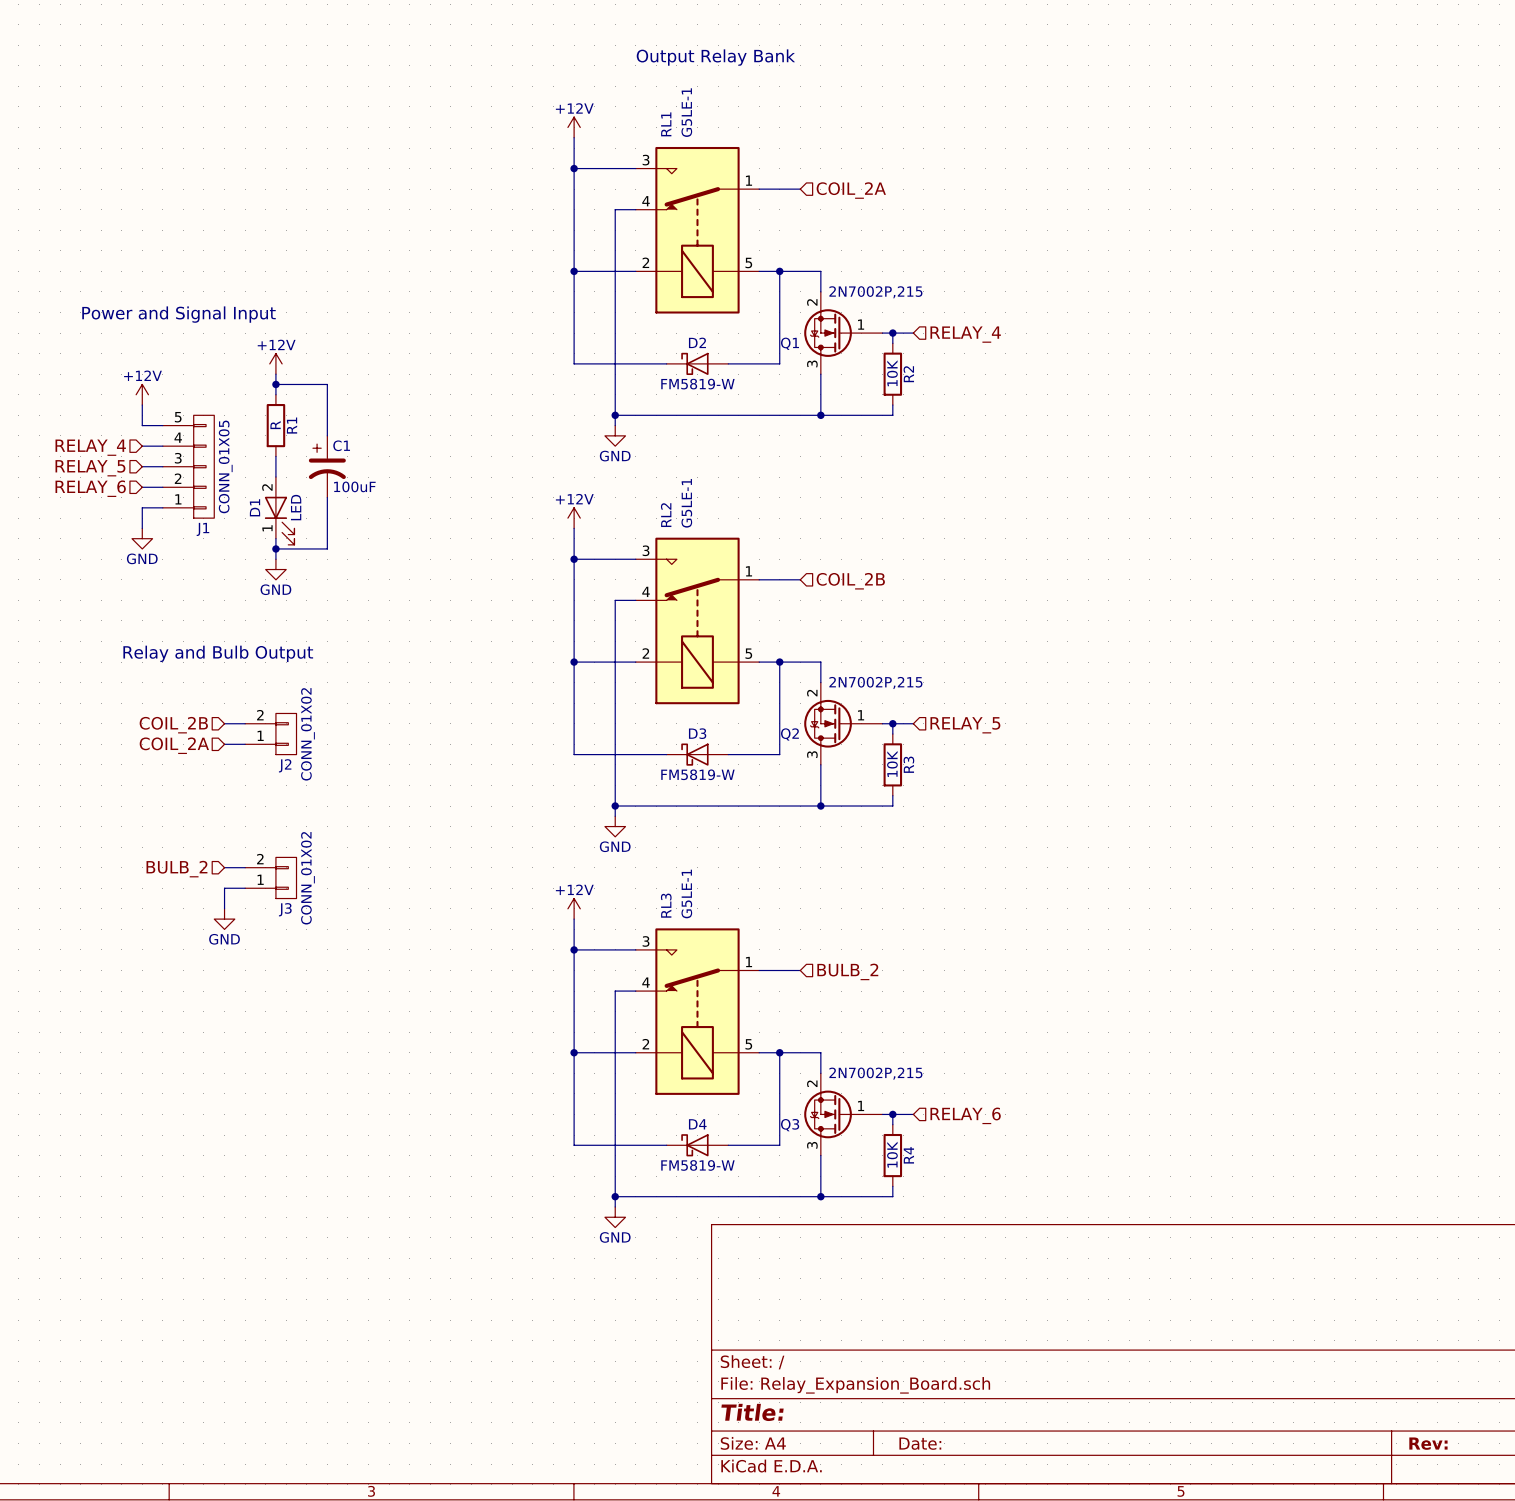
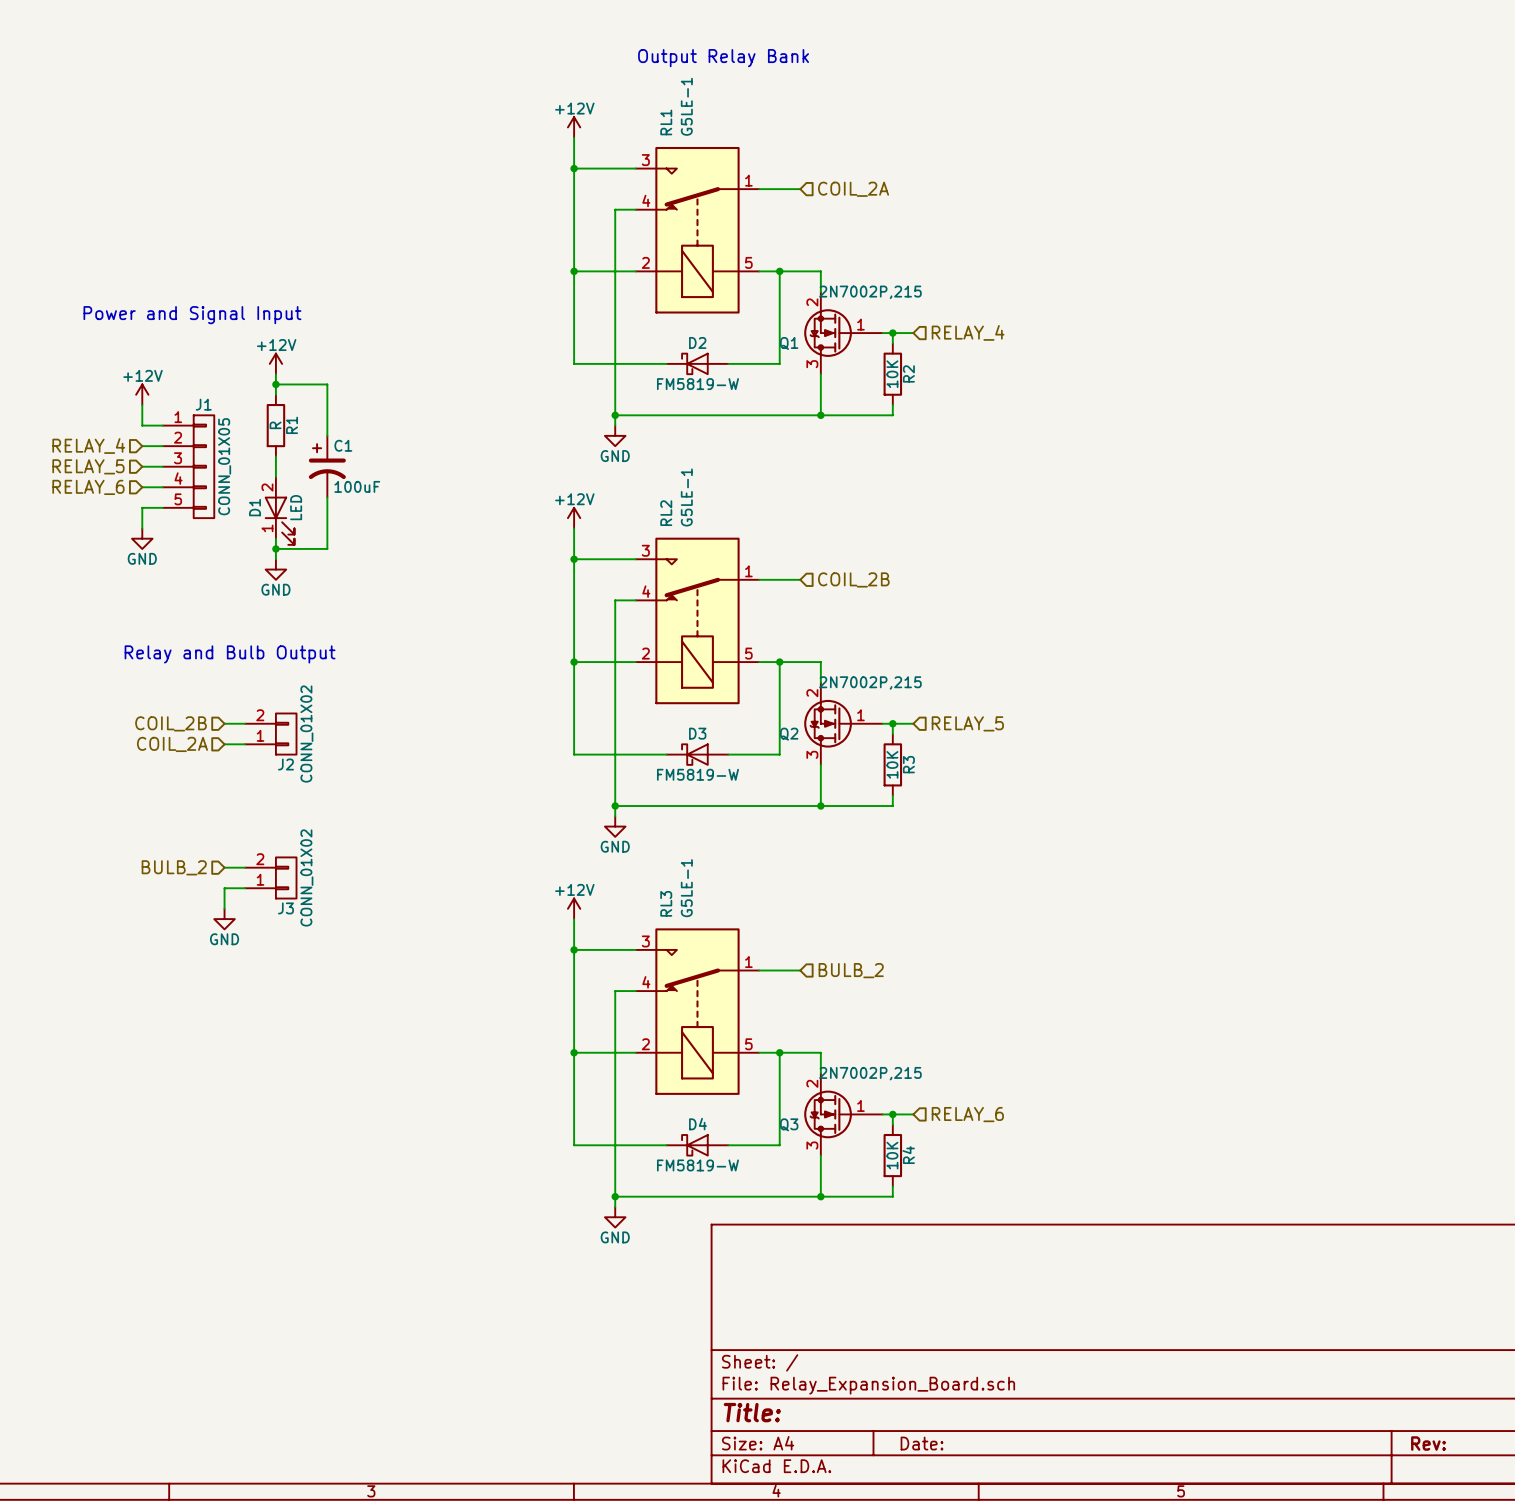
J1 flip: as is (203, 466) -> up-down (203, 466)

